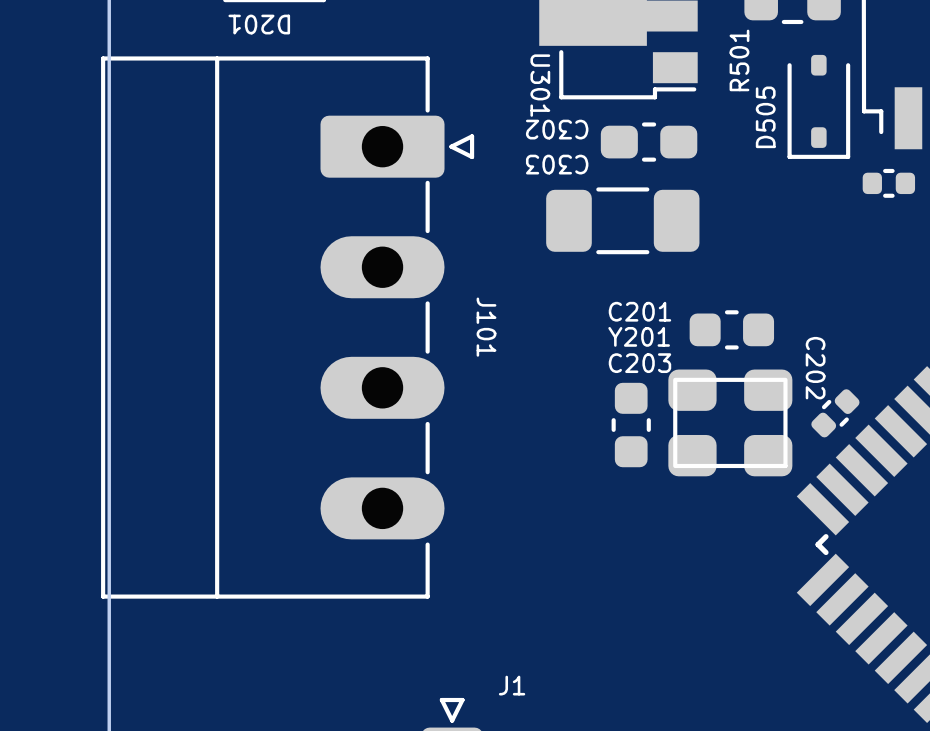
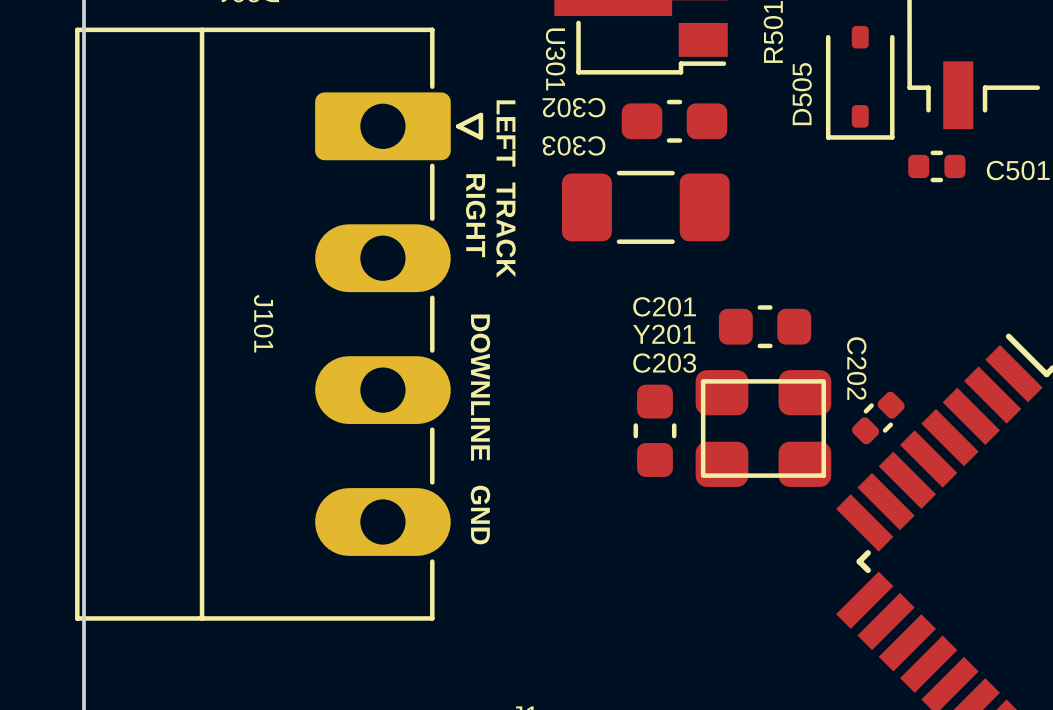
text: none -> LEFT TRACK (506, 189)
text: none -> RIGHT (475, 215)
J101 name position: J101 (486, 327) -> J101 (263, 323)
text: none -> DOWNLINE GND (480, 429)

